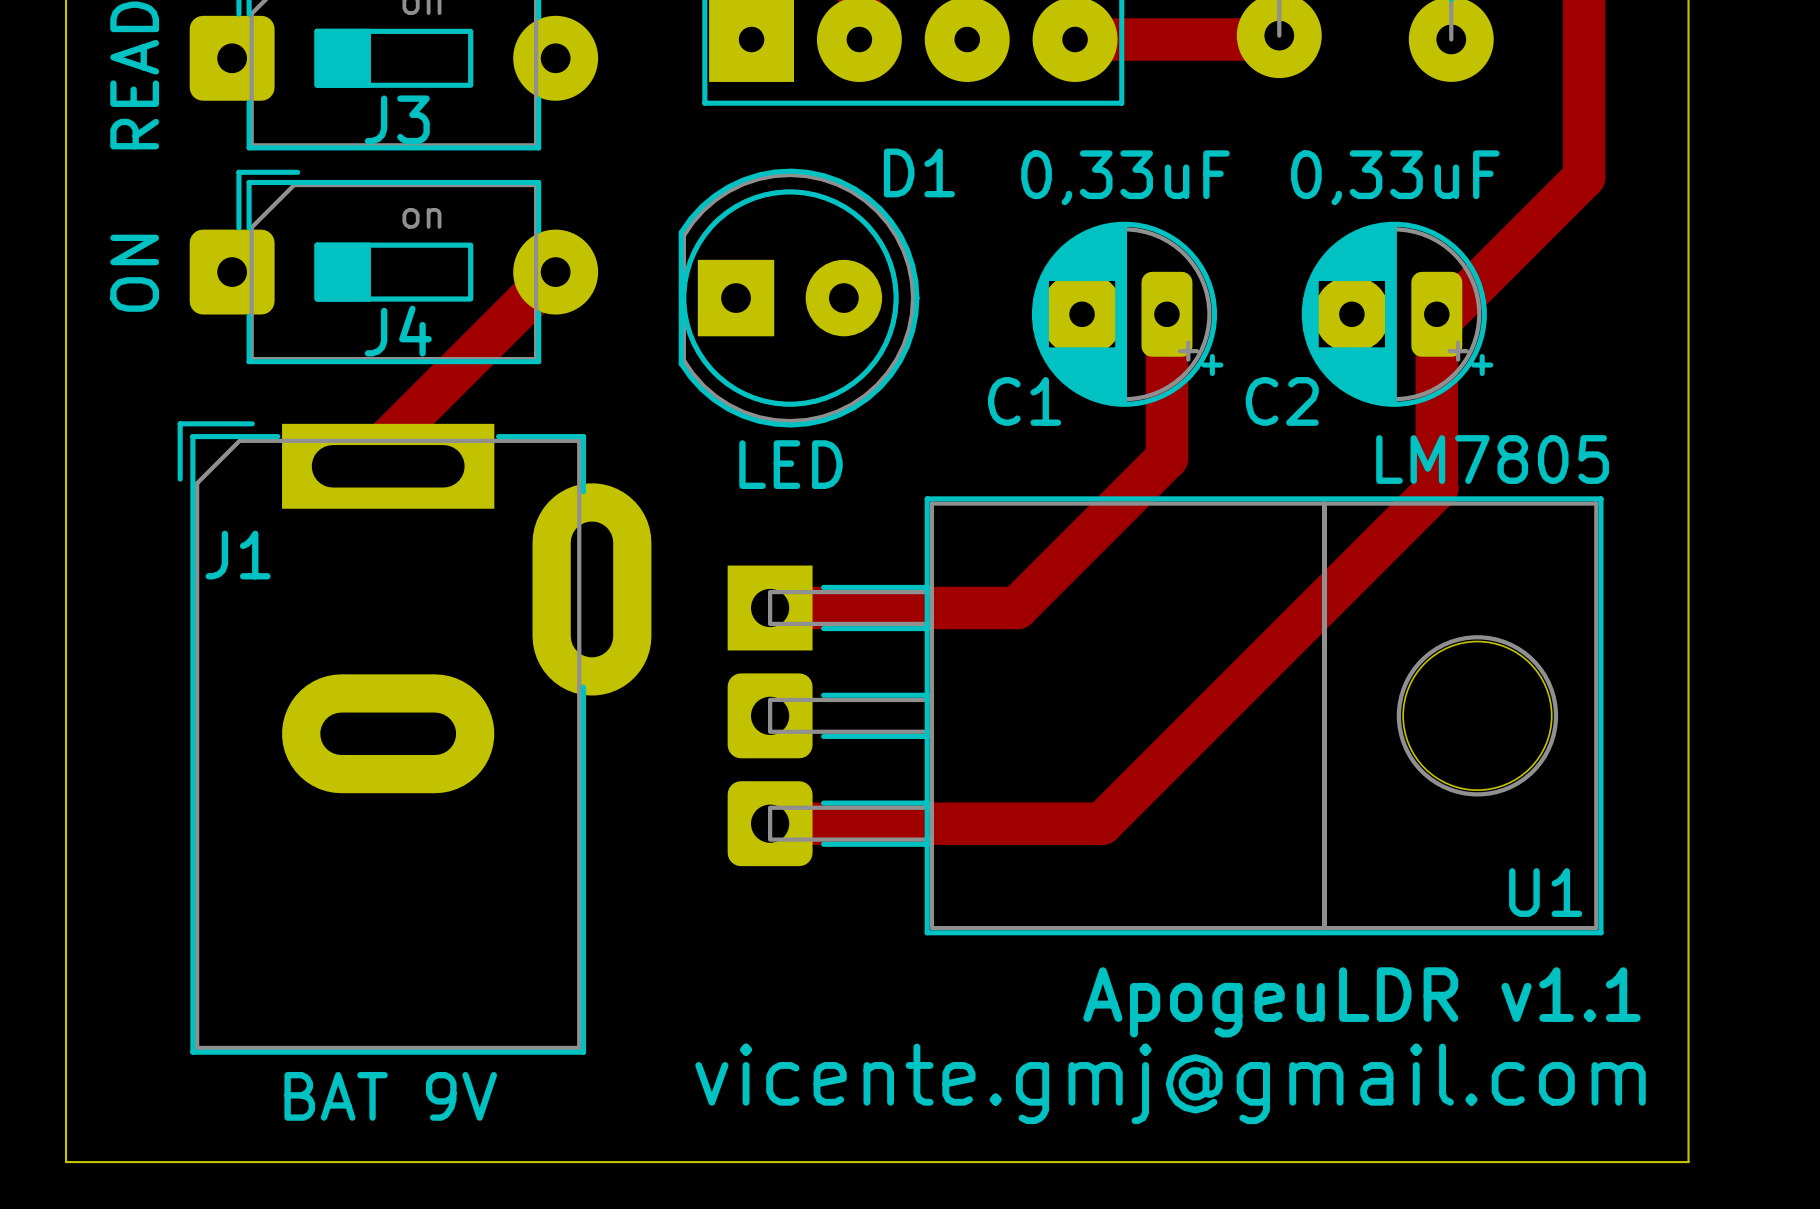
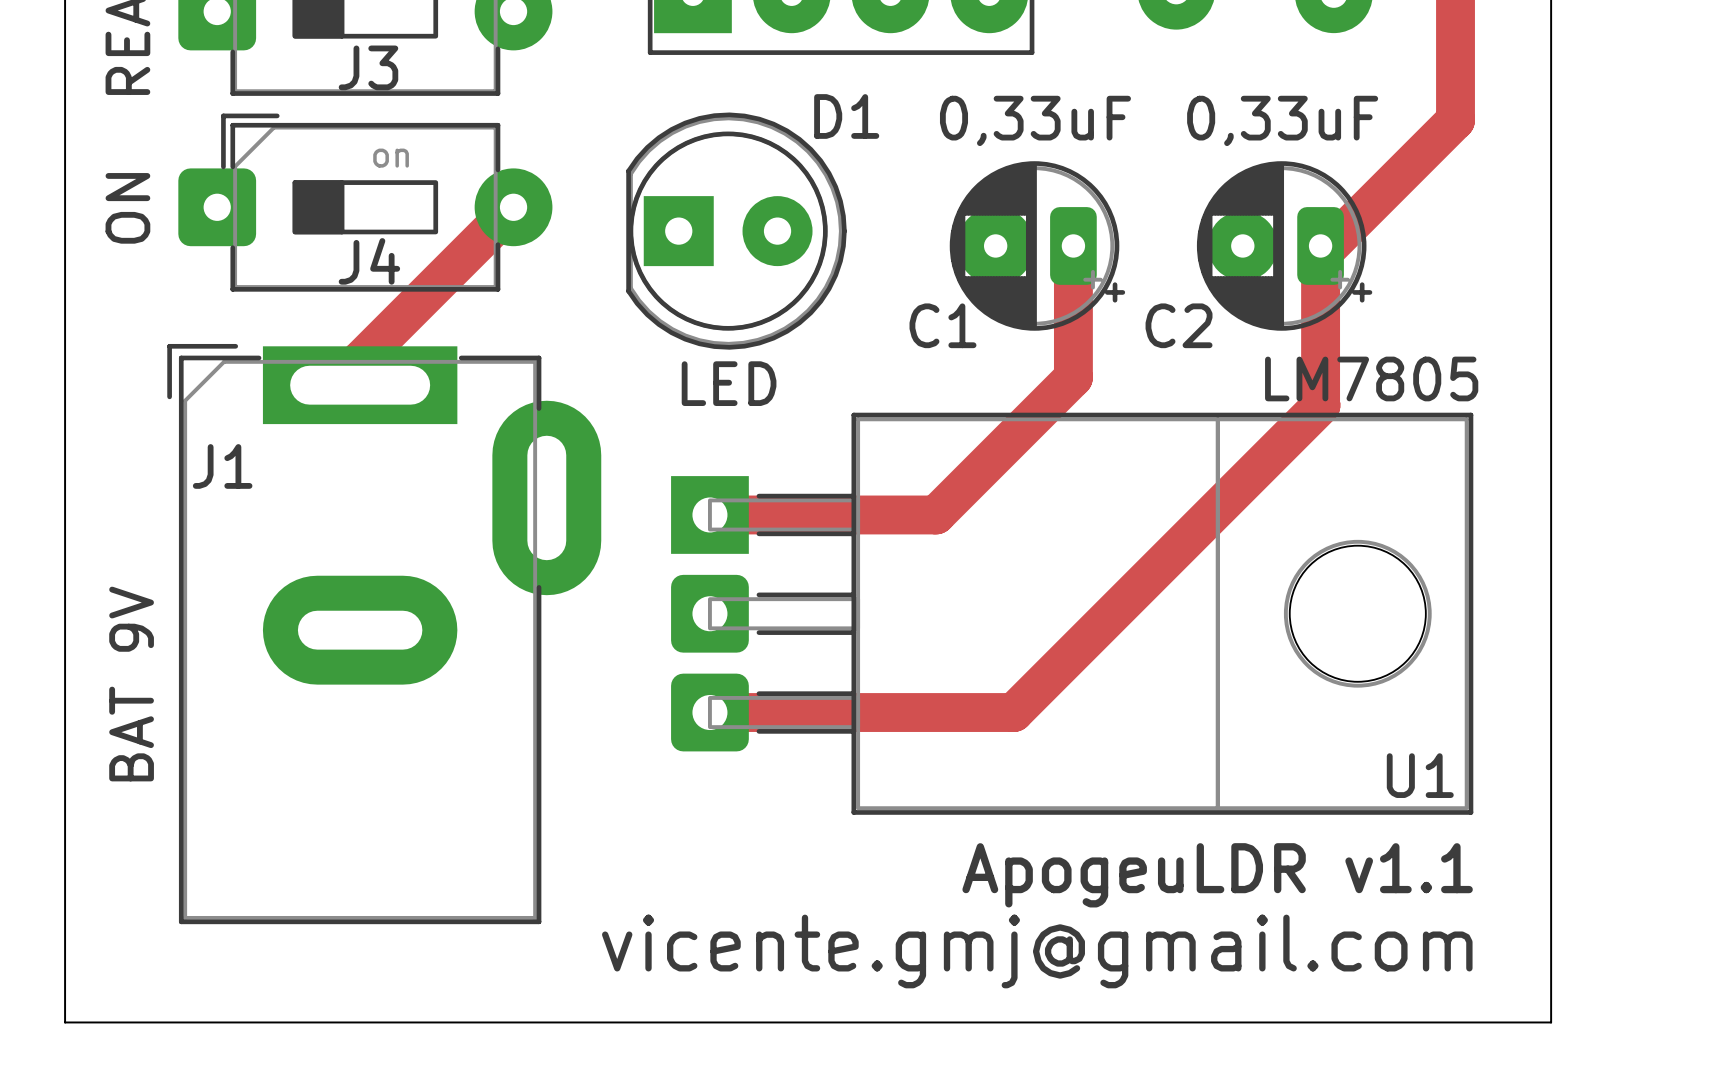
text position: ApogeuLDR v1.1 (1361, 1002) -> ApogeuLDR v1.1 (1217, 875)
text position: vicente.gmj@gmail.com (1170, 1083) -> vicente.gmj@gmail.com (1037, 951)
J1 value rotation: 0° (390, 1096) -> 90° counterclockwise (131, 684)
J1 value position: BAT 9V (390, 1096) -> BAT 9V (131, 684)

